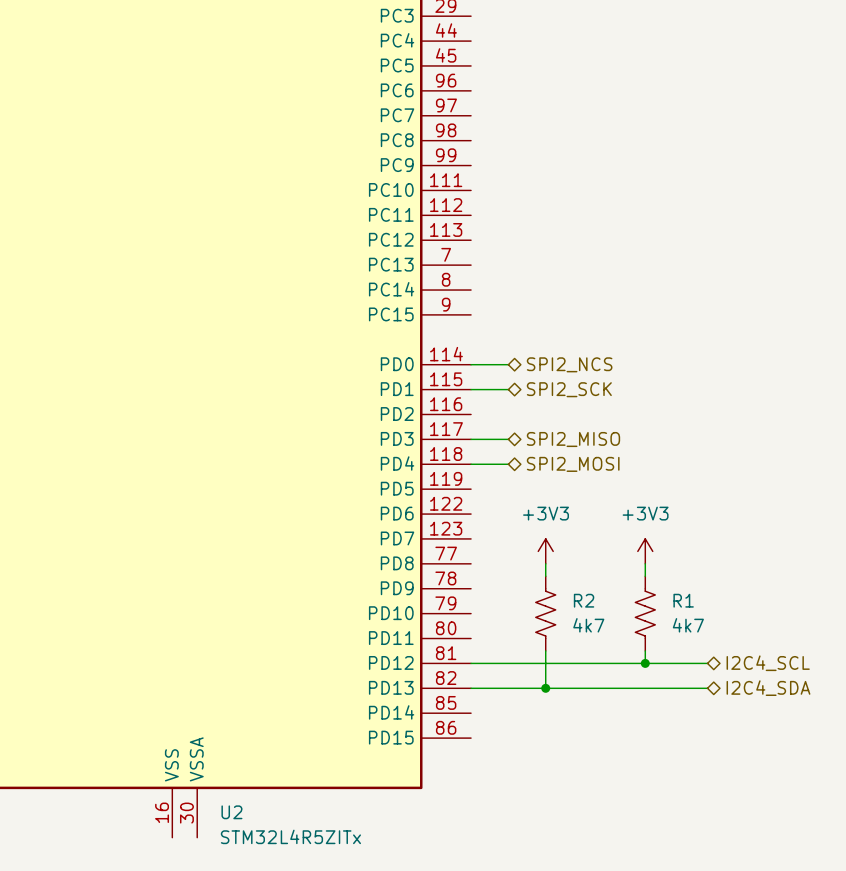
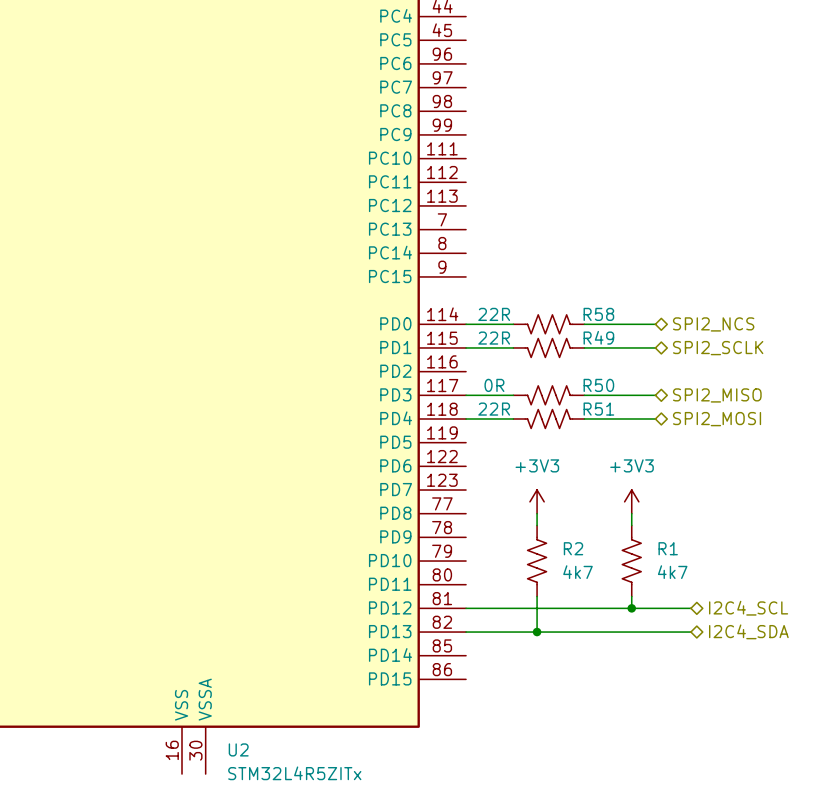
wire: none -> (501, 324) (513, 324)
R58: none -> 22R (548, 324)
hierarchical label position: SPI2_NCS (569, 364) -> SPI2_NCS (713, 324)
wire: none -> (584, 324) (655, 324)
wire: none -> (501, 347) (513, 347)
R49: none -> 22R (548, 347)
hierarchical label: SPI2_SCK (569, 389) -> none
wire: none -> (584, 347) (655, 347)
hierarchical label: none -> SPI2_SCLK (718, 348)
wire: none -> (501, 395) (513, 395)
R50: none -> 0R (548, 395)
hierarchical label position: SPI2_MISO (573, 439) -> SPI2_MISO (717, 395)
wire: none -> (584, 395) (655, 395)
wire: none -> (501, 418) (513, 418)
R51: none -> 22R (548, 418)
hierarchical label position: SPI2_MOSI (573, 464) -> SPI2_MOSI (717, 419)
wire: none -> (584, 418) (655, 418)

